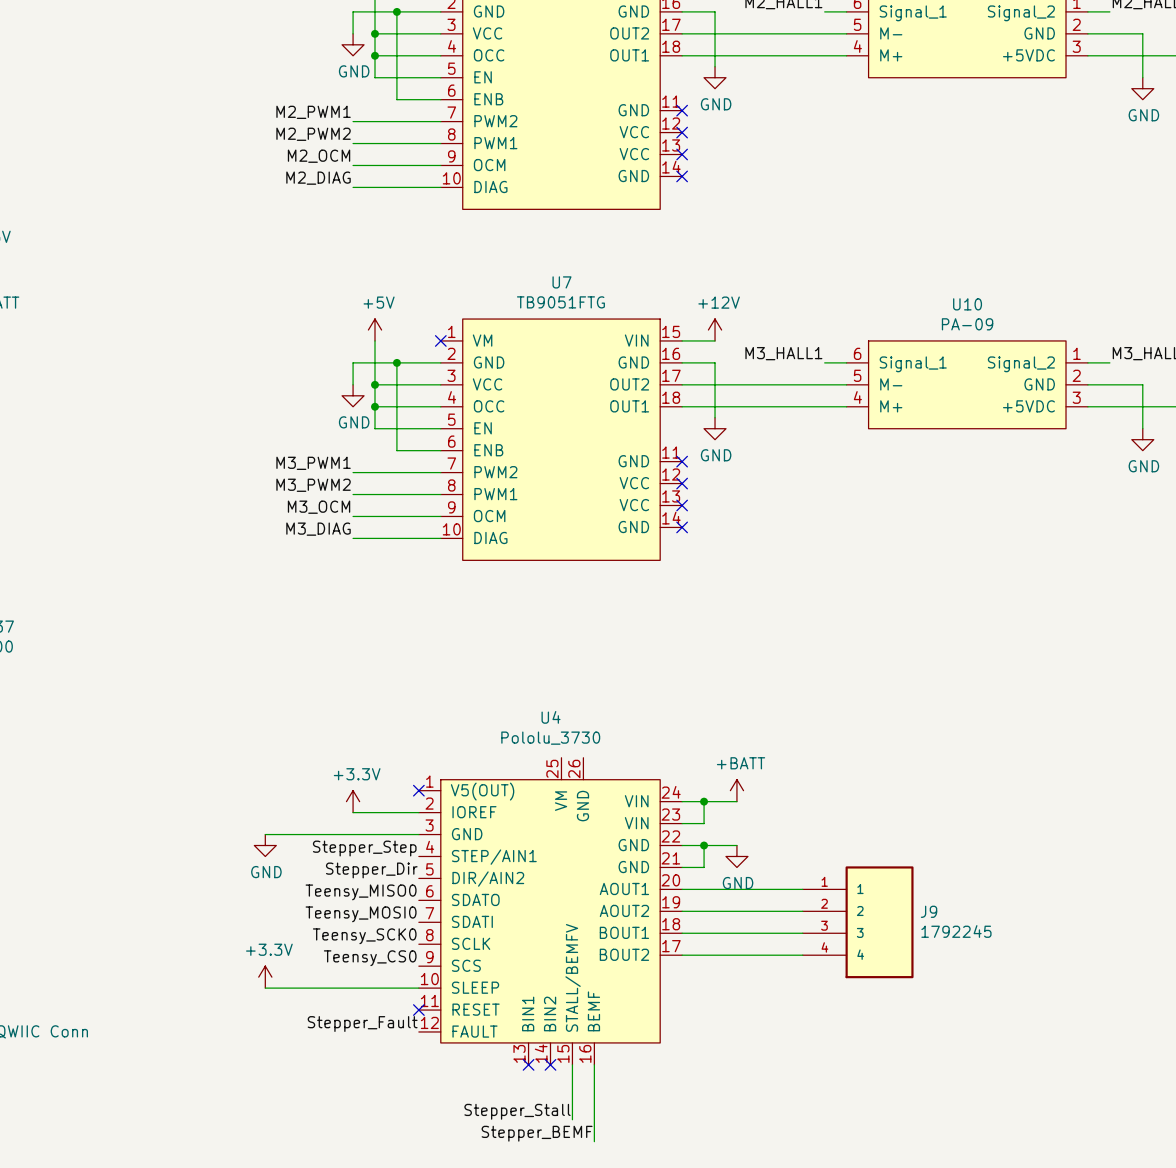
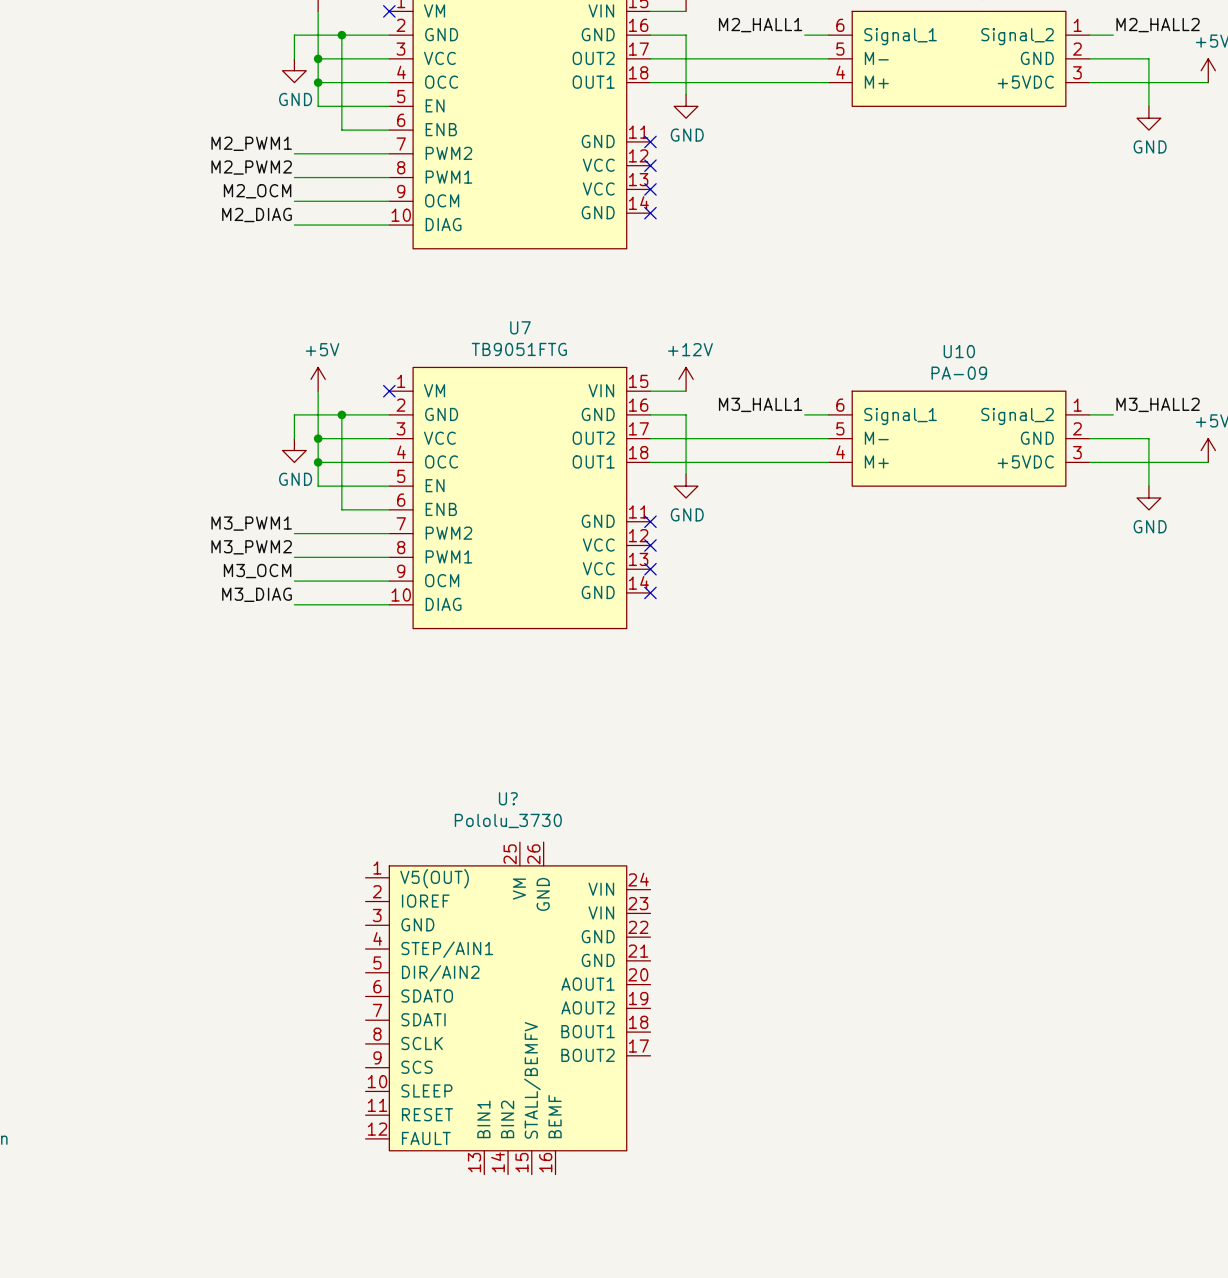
U4 name: U4 (551, 717) -> U? (508, 798)
no-connect mark: (418, 790) -> none
power symbol: +BATT (736, 790) -> none
power symbol: +3.3V (353, 801) -> none
wire: (682, 801) (736, 801) -> none
wire: (704, 801) (704, 823) (682, 823) -> none
junction: (704, 801) -> none
wire: (353, 812) (418, 812) -> none
wire: (265, 834) (418, 834) -> none
power symbol: GND (265, 845) -> none
wire: (682, 845) (736, 845) -> none
wire: (704, 845) (704, 867) (682, 867) -> none
junction: (704, 845) -> none
label: Stepper_Step (364, 848) -> none
power symbol: GND (736, 856) -> none
label: Stepper_Dir (371, 870) -> none
wire: (682, 889) (802, 889) -> none
label: Teensy_MISO0 (361, 892) -> none
wire: (682, 911) (802, 911) -> none
label: Teensy_MOSI0 (361, 914) -> none
J9: 1792245 (858, 922) -> none
wire: (682, 933) (802, 933) -> none
label: Teensy_SCK0 (364, 936) -> none
wire: (682, 955) (802, 955) -> none
label: Teensy_CS0 (370, 958) -> none
power symbol: +3.3V (265, 977) -> none
wire: (265, 988) (418, 988) -> none
no-connect mark: (418, 1010) -> none
label: Stepper_Fault (362, 1024) -> none
no-connect mark: (528, 1064) -> none
no-connect mark: (550, 1064) -> none
wire: (572, 1064) (572, 1119) -> none
wire: (594, 1064) (594, 1141) -> none
label: Stepper_Stall (517, 1111) -> none
label: Stepper_BEMF (537, 1133) -> none

